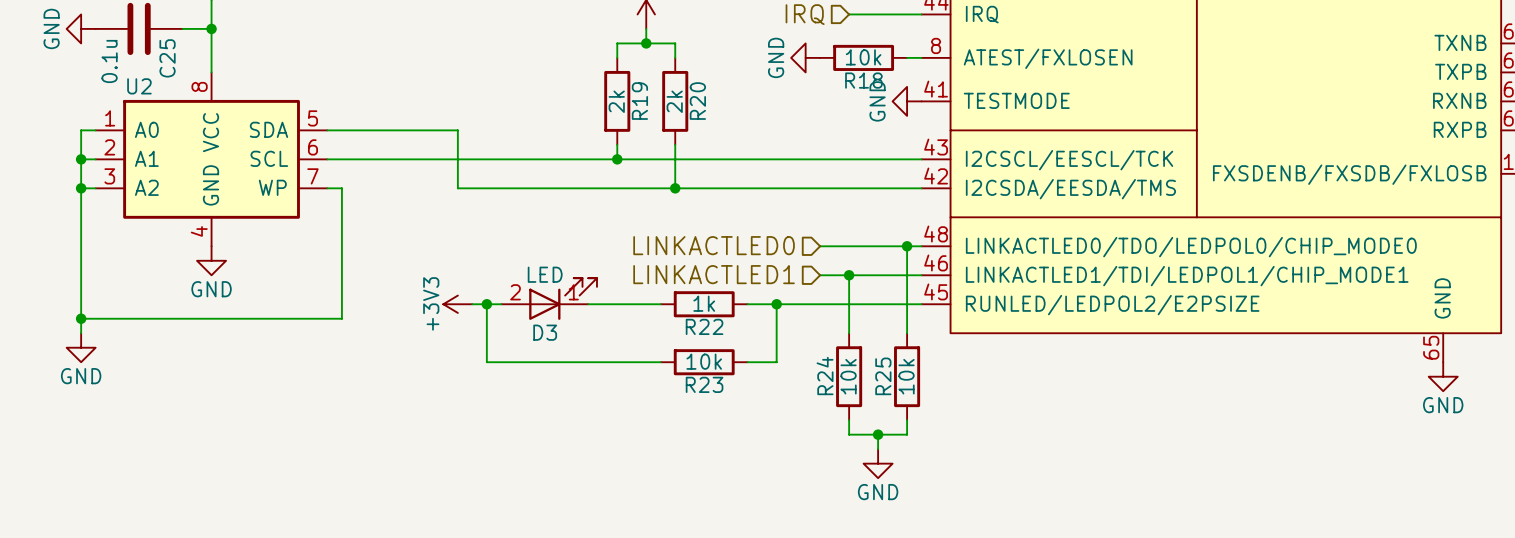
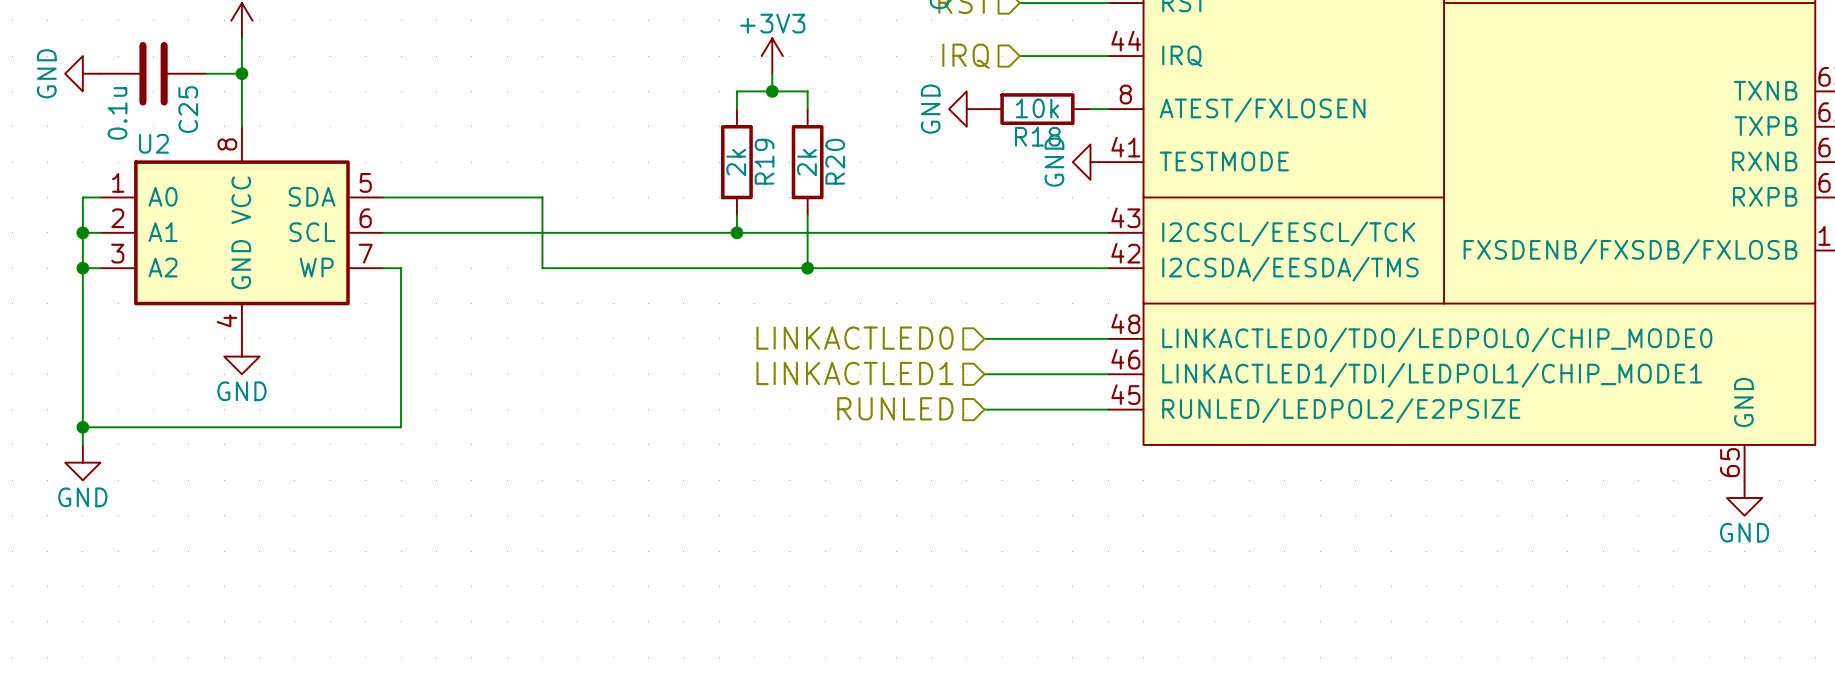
wire: (907, 246) (907, 333) -> none
junction: (907, 246) -> none
wire: (849, 275) (849, 333) -> none
junction: (849, 275) -> none
D3: LED (549, 299) -> none
hierarchical label: none -> RUNLED (895, 408)
power symbol: +3V3 (457, 304) -> none
wire: (472, 304) (501, 304) -> none
wire: (486, 304) (486, 362) (660, 362) -> none
junction: (486, 304) -> none
wire: (588, 304) (660, 304) -> none
R22: 1k (704, 304) -> none
wire: (747, 304) (820, 304) -> none
wire: (776, 304) (776, 362) (747, 362) -> none
junction: (776, 304) -> none
R23: 10k (704, 362) -> none
R24: 10k (849, 376) -> none
R25: 10k (907, 376) -> none
wire: (849, 420) (849, 434) (907, 434) (907, 420) -> none
wire: (878, 434) (878, 449) -> none
junction: (878, 434) -> none
power symbol: GND (878, 463) -> none

